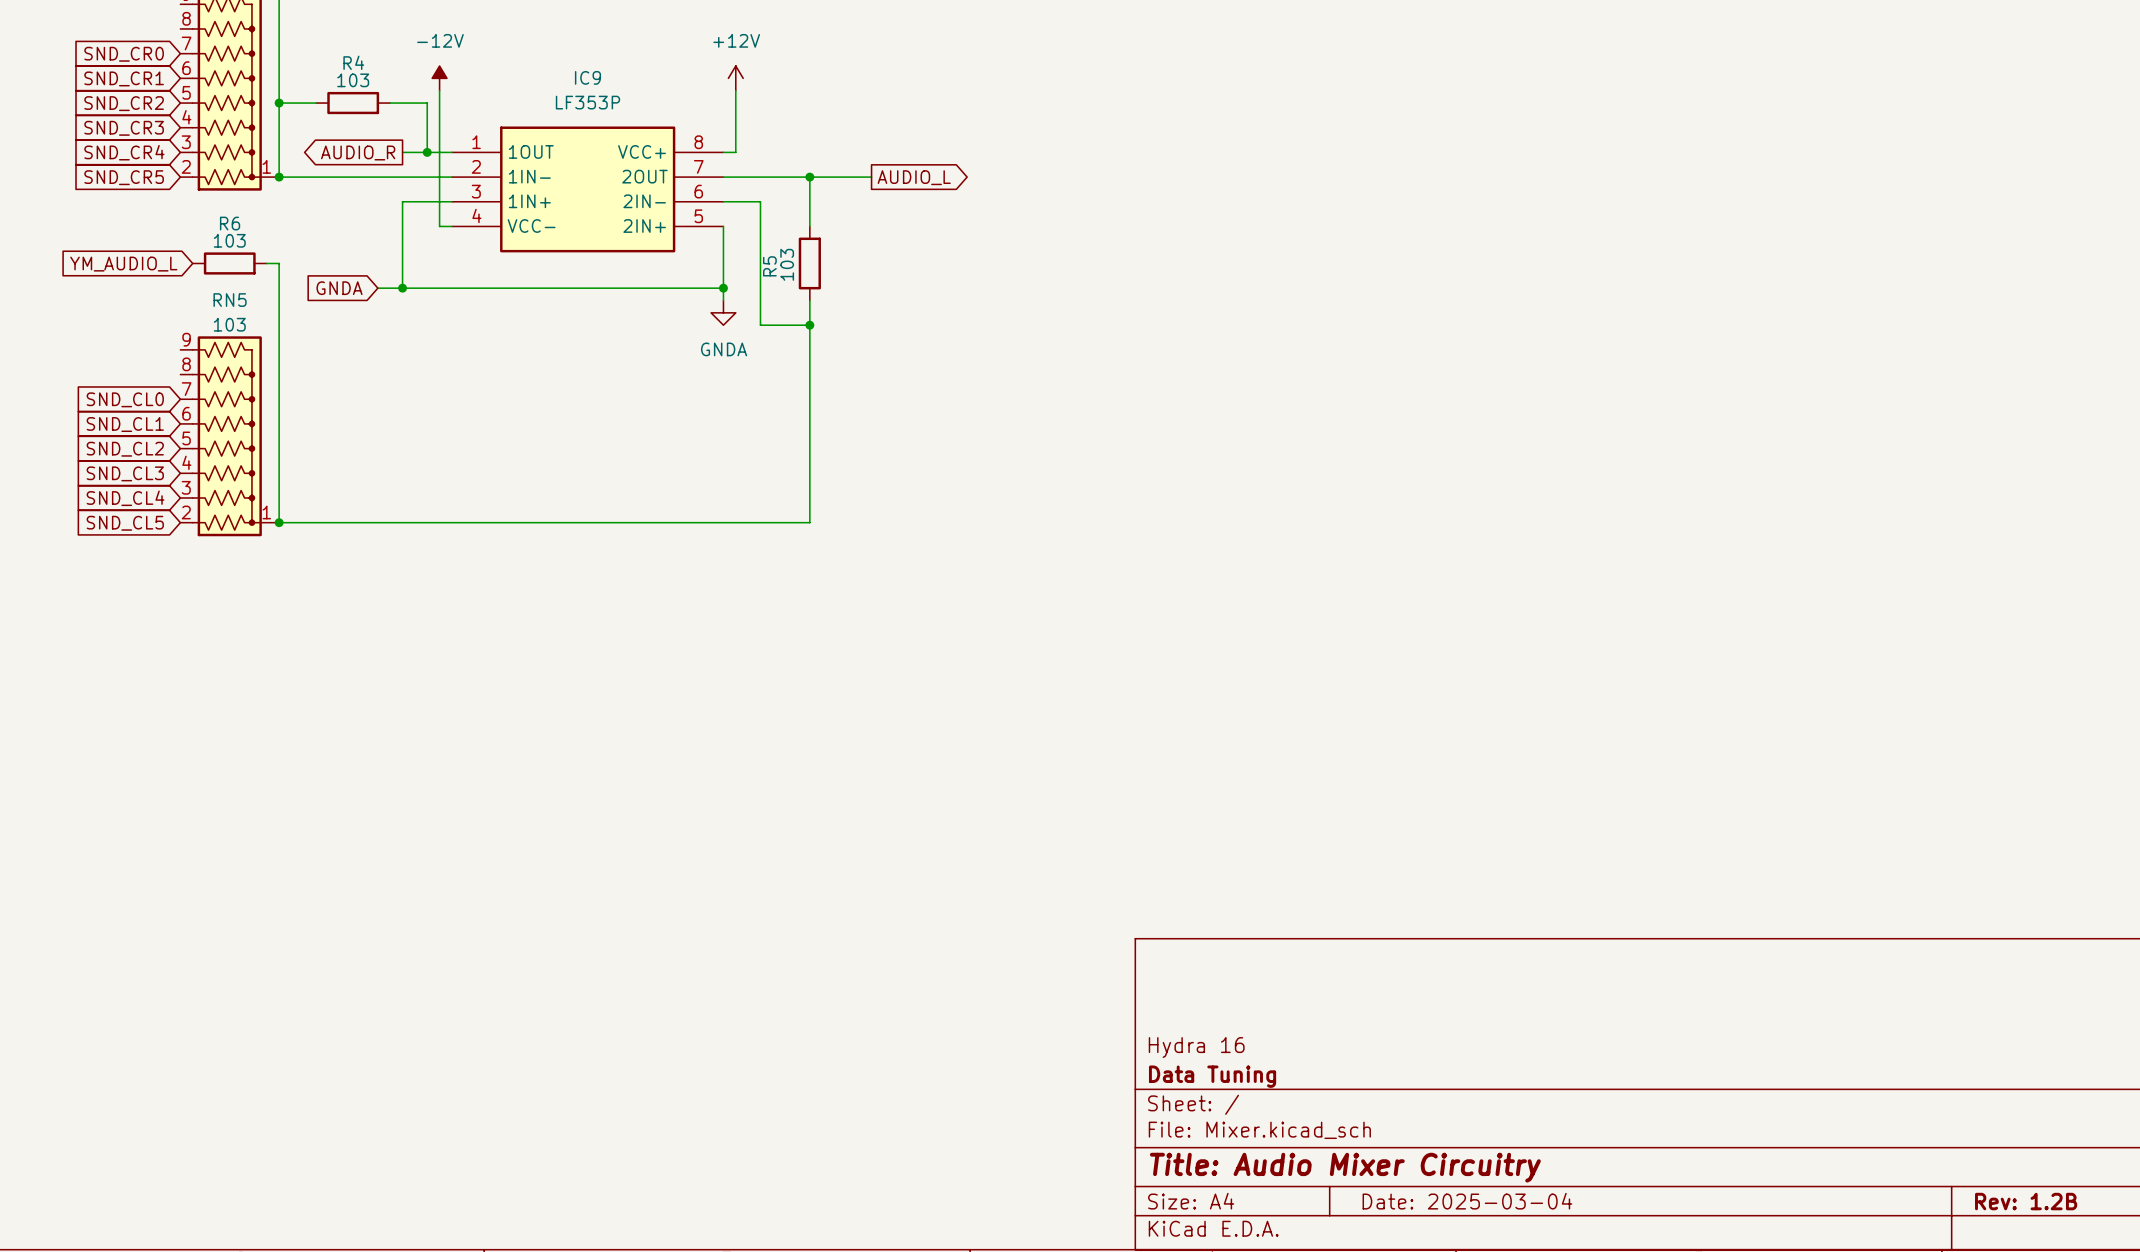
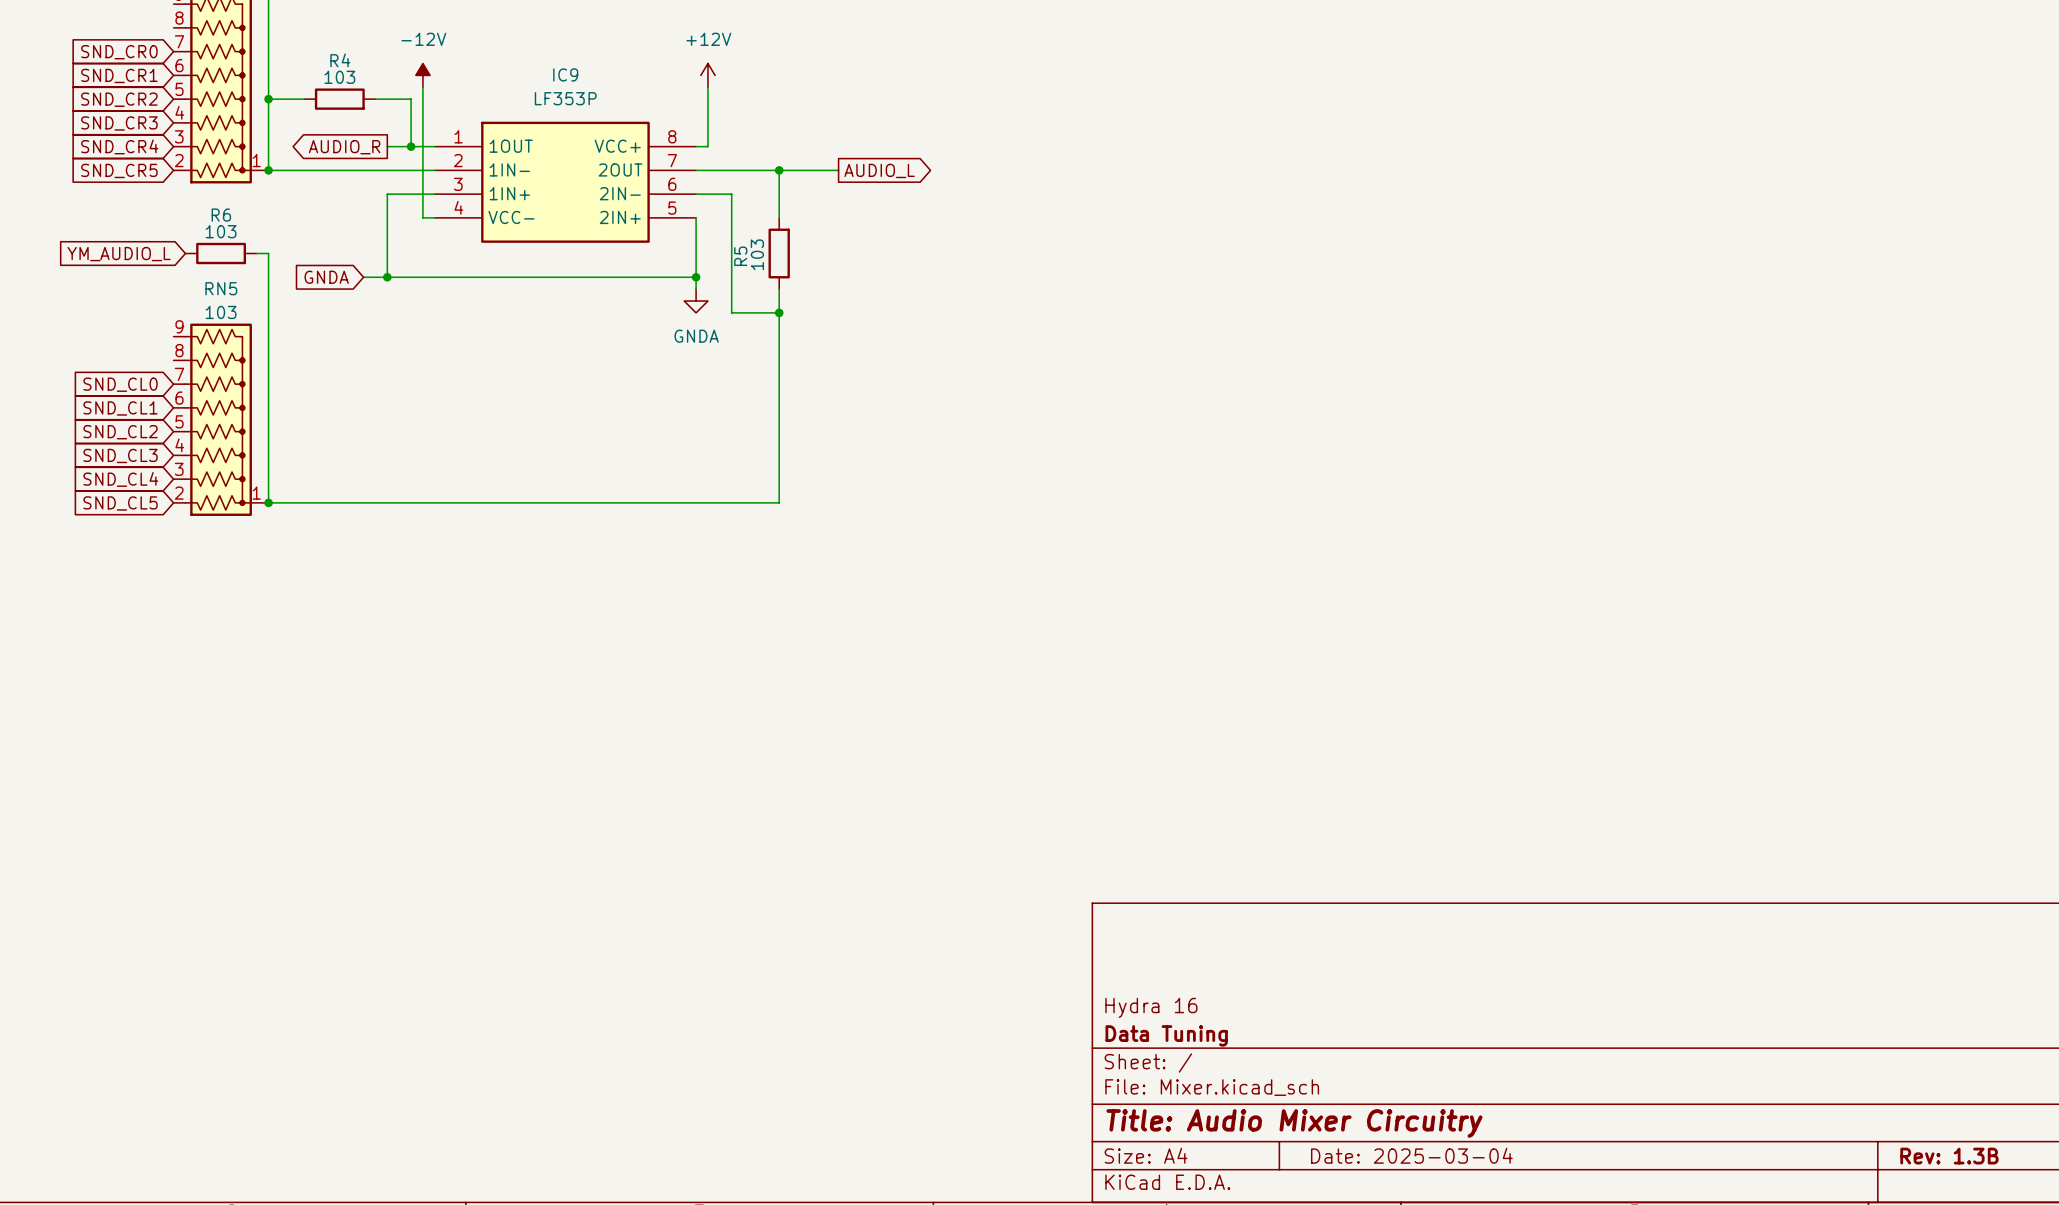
title block: Rev: 1.2B (2026, 1201) -> Rev: 1.3B (1949, 1156)

